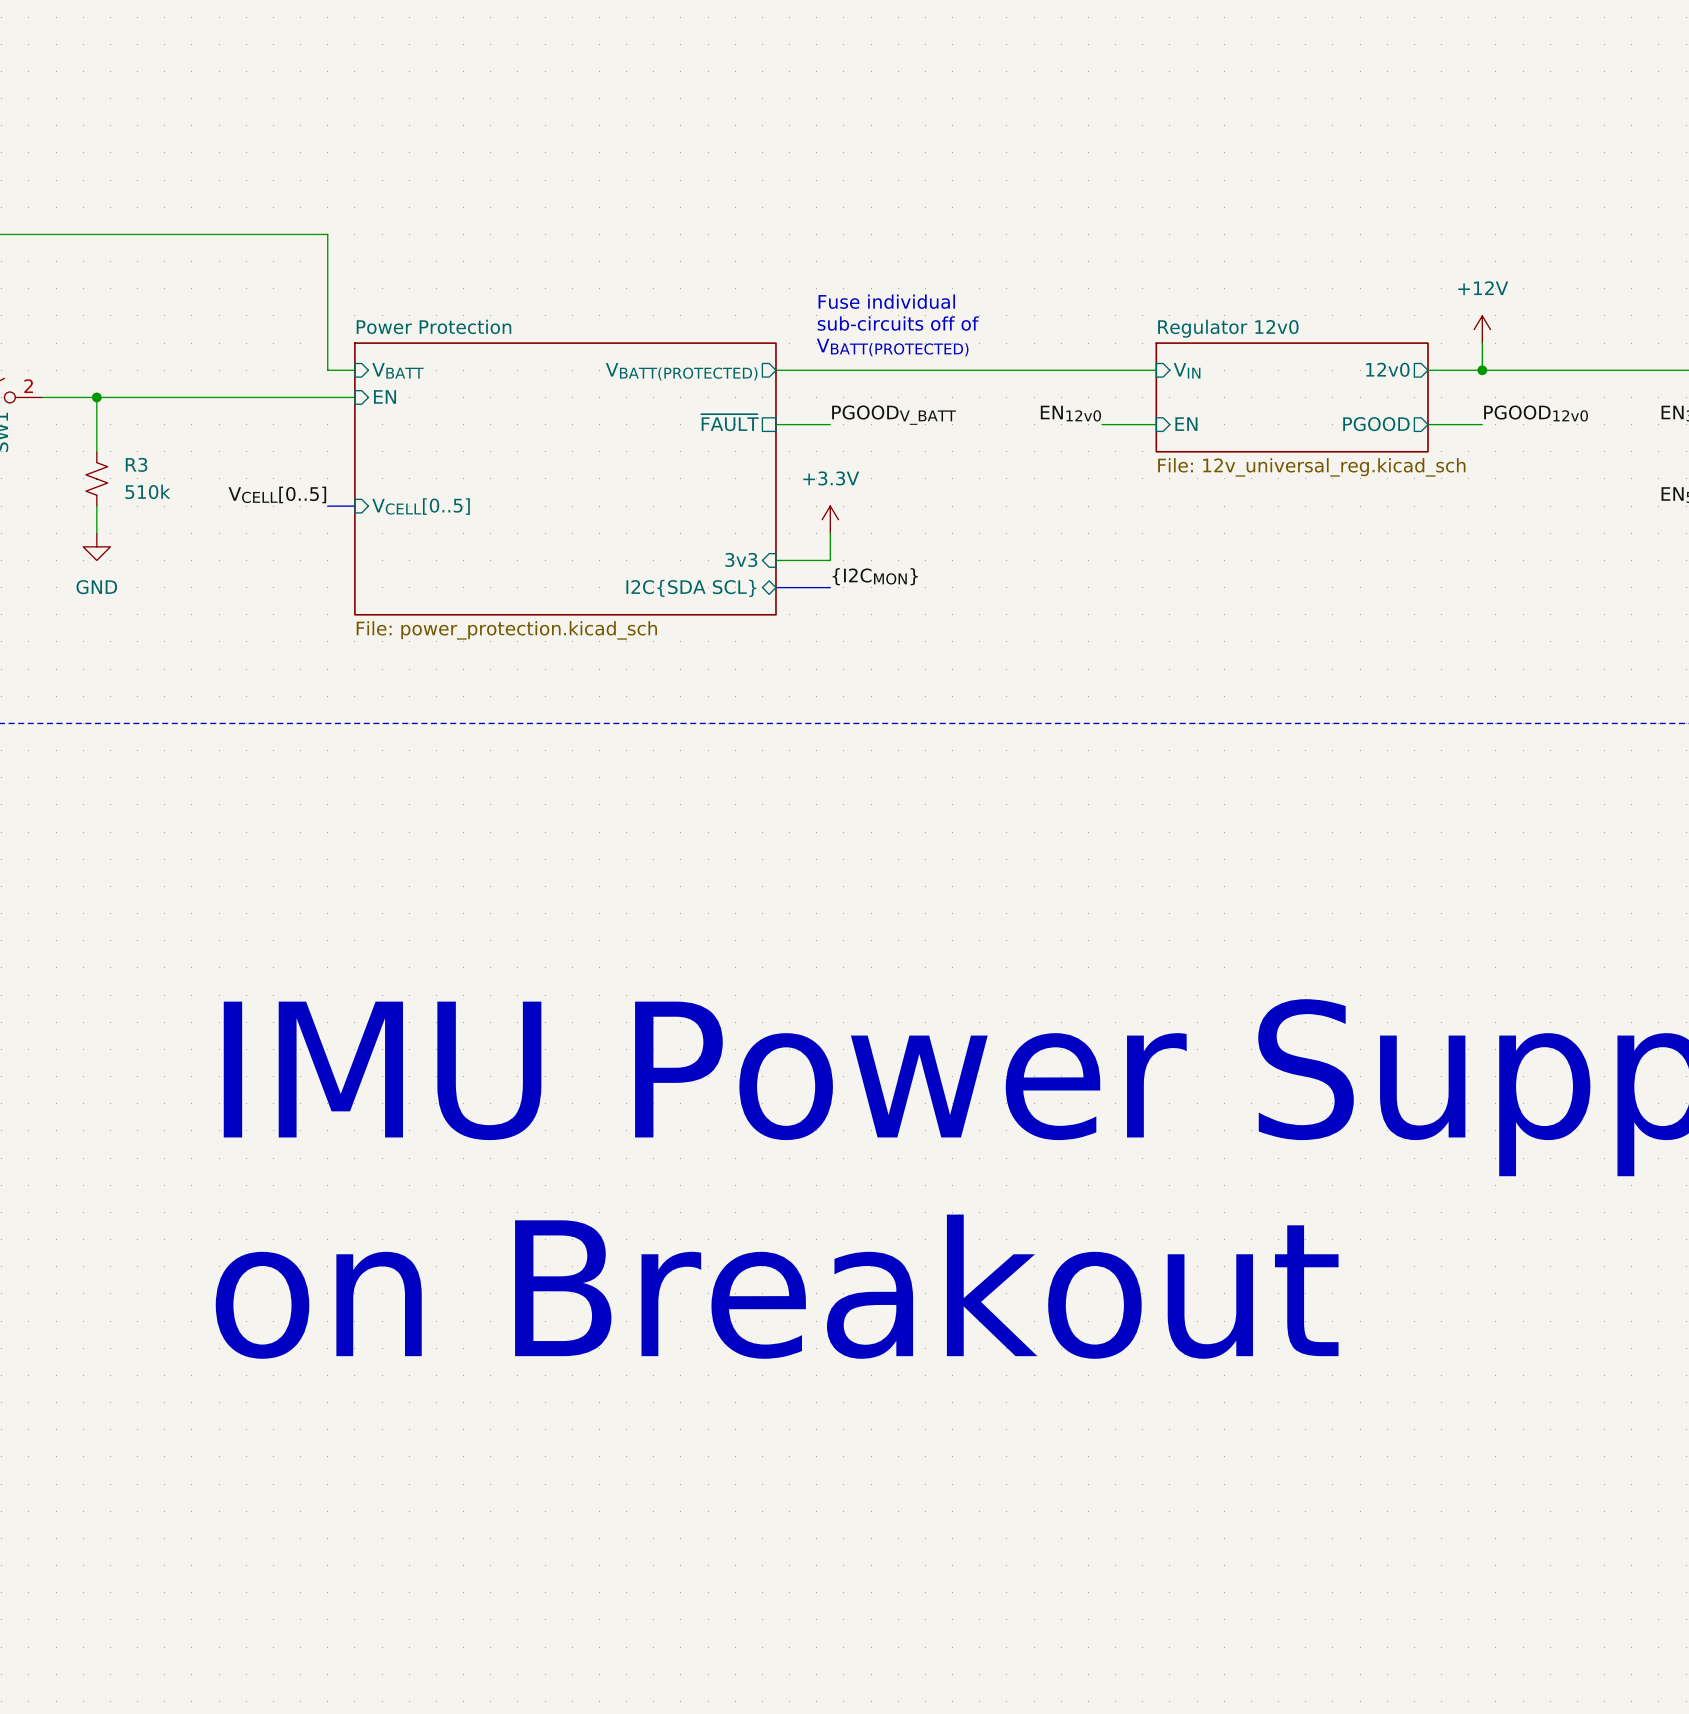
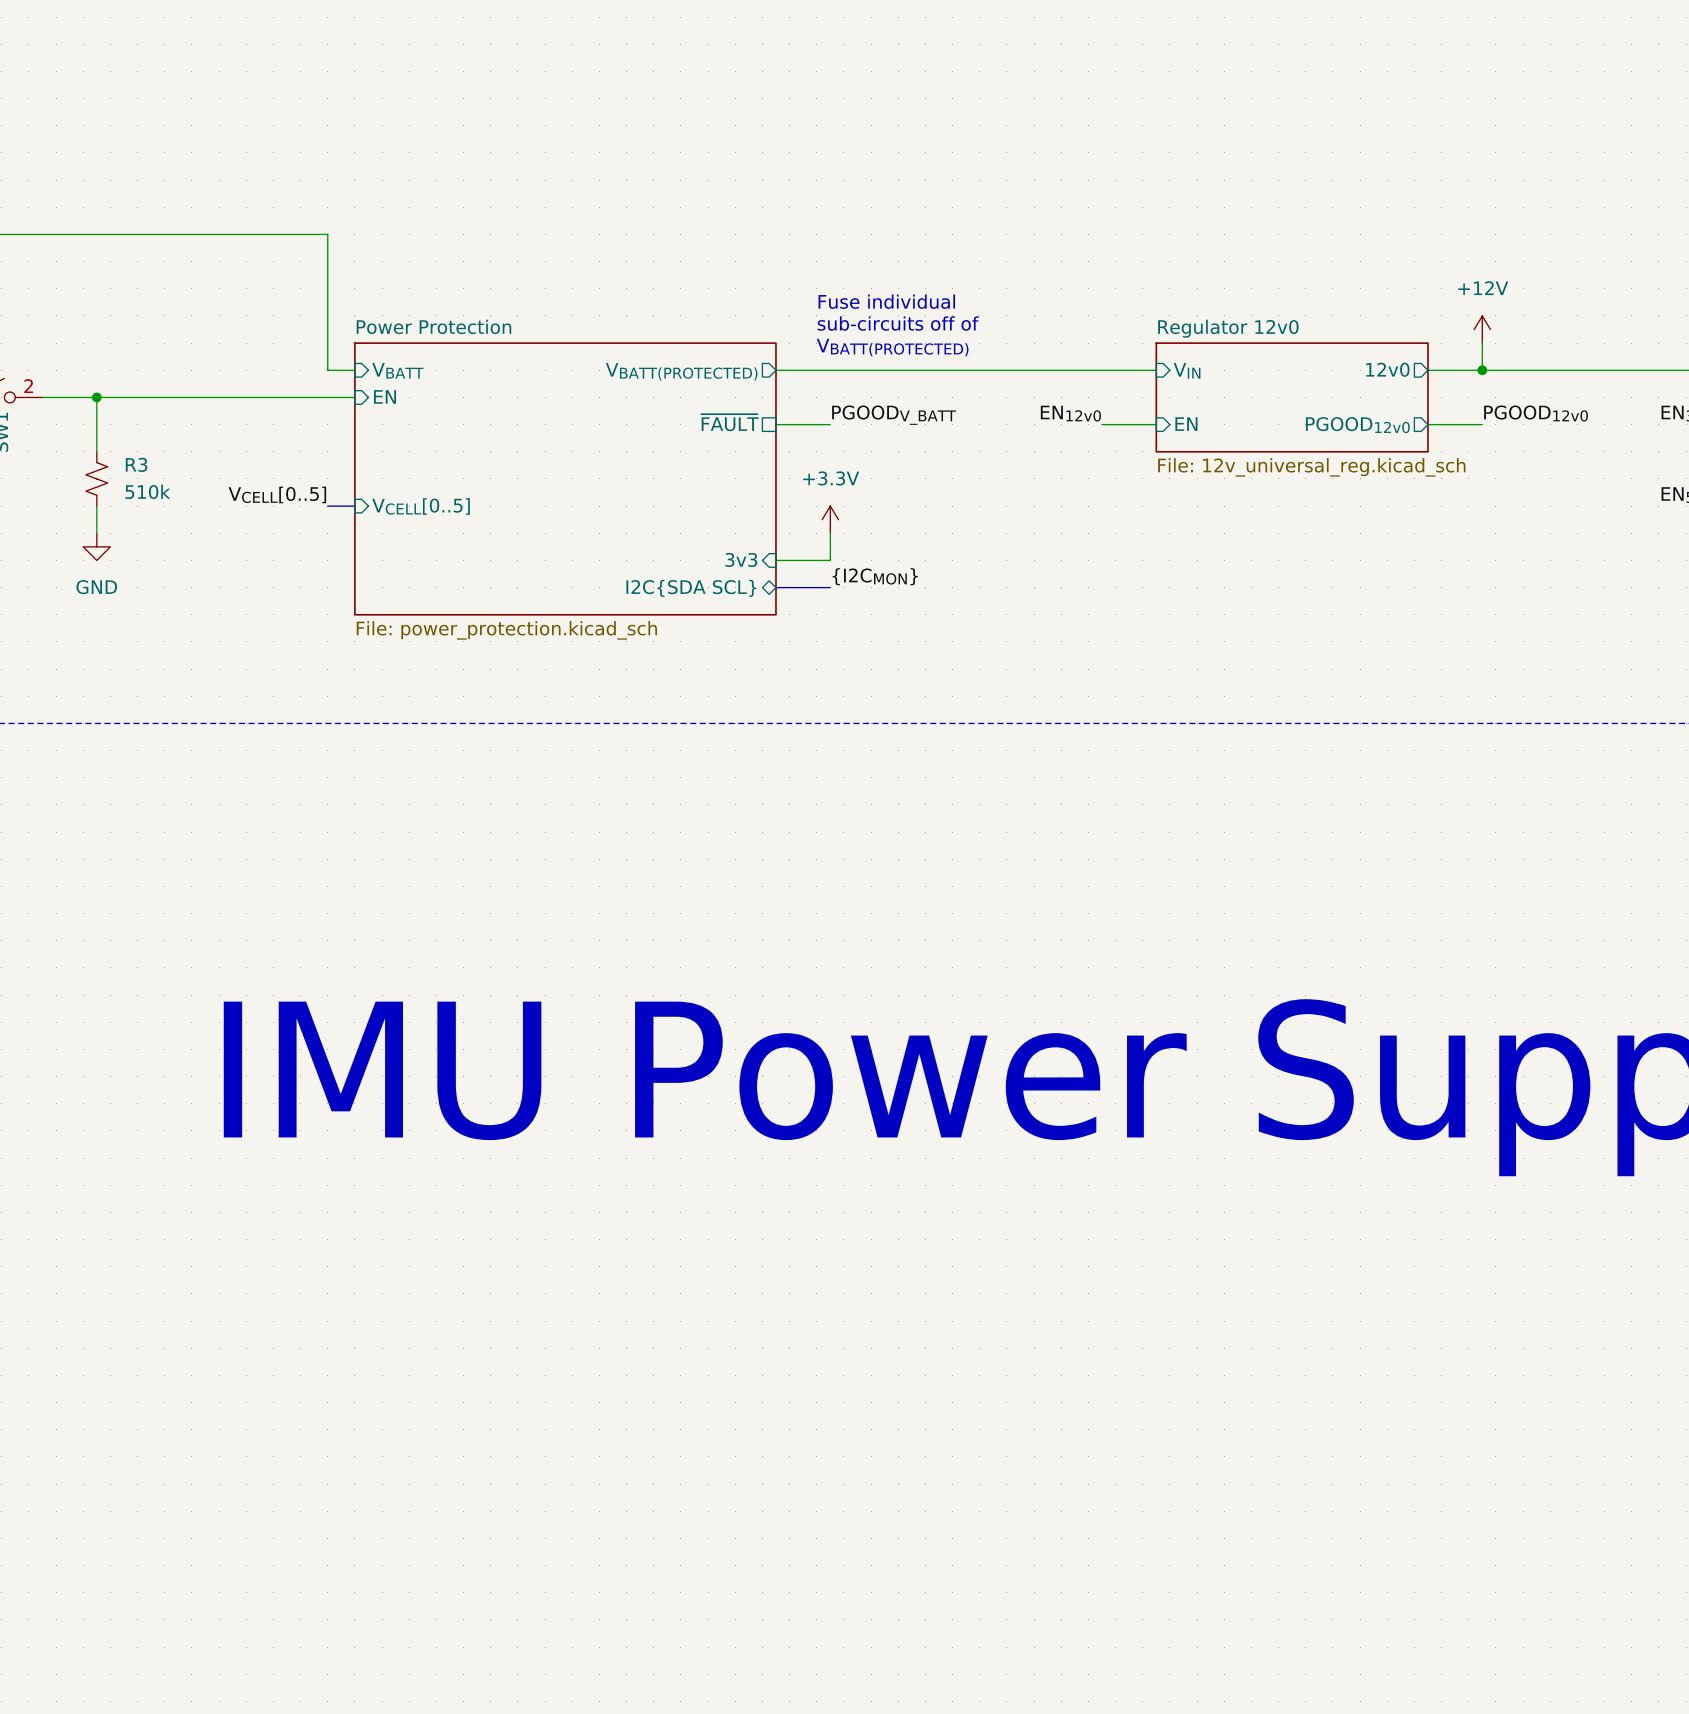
sheet pin: PGOOD (1376, 424) -> PGOOD12v0 (1357, 425)
text: on Breakout (777, 1286) -> none

